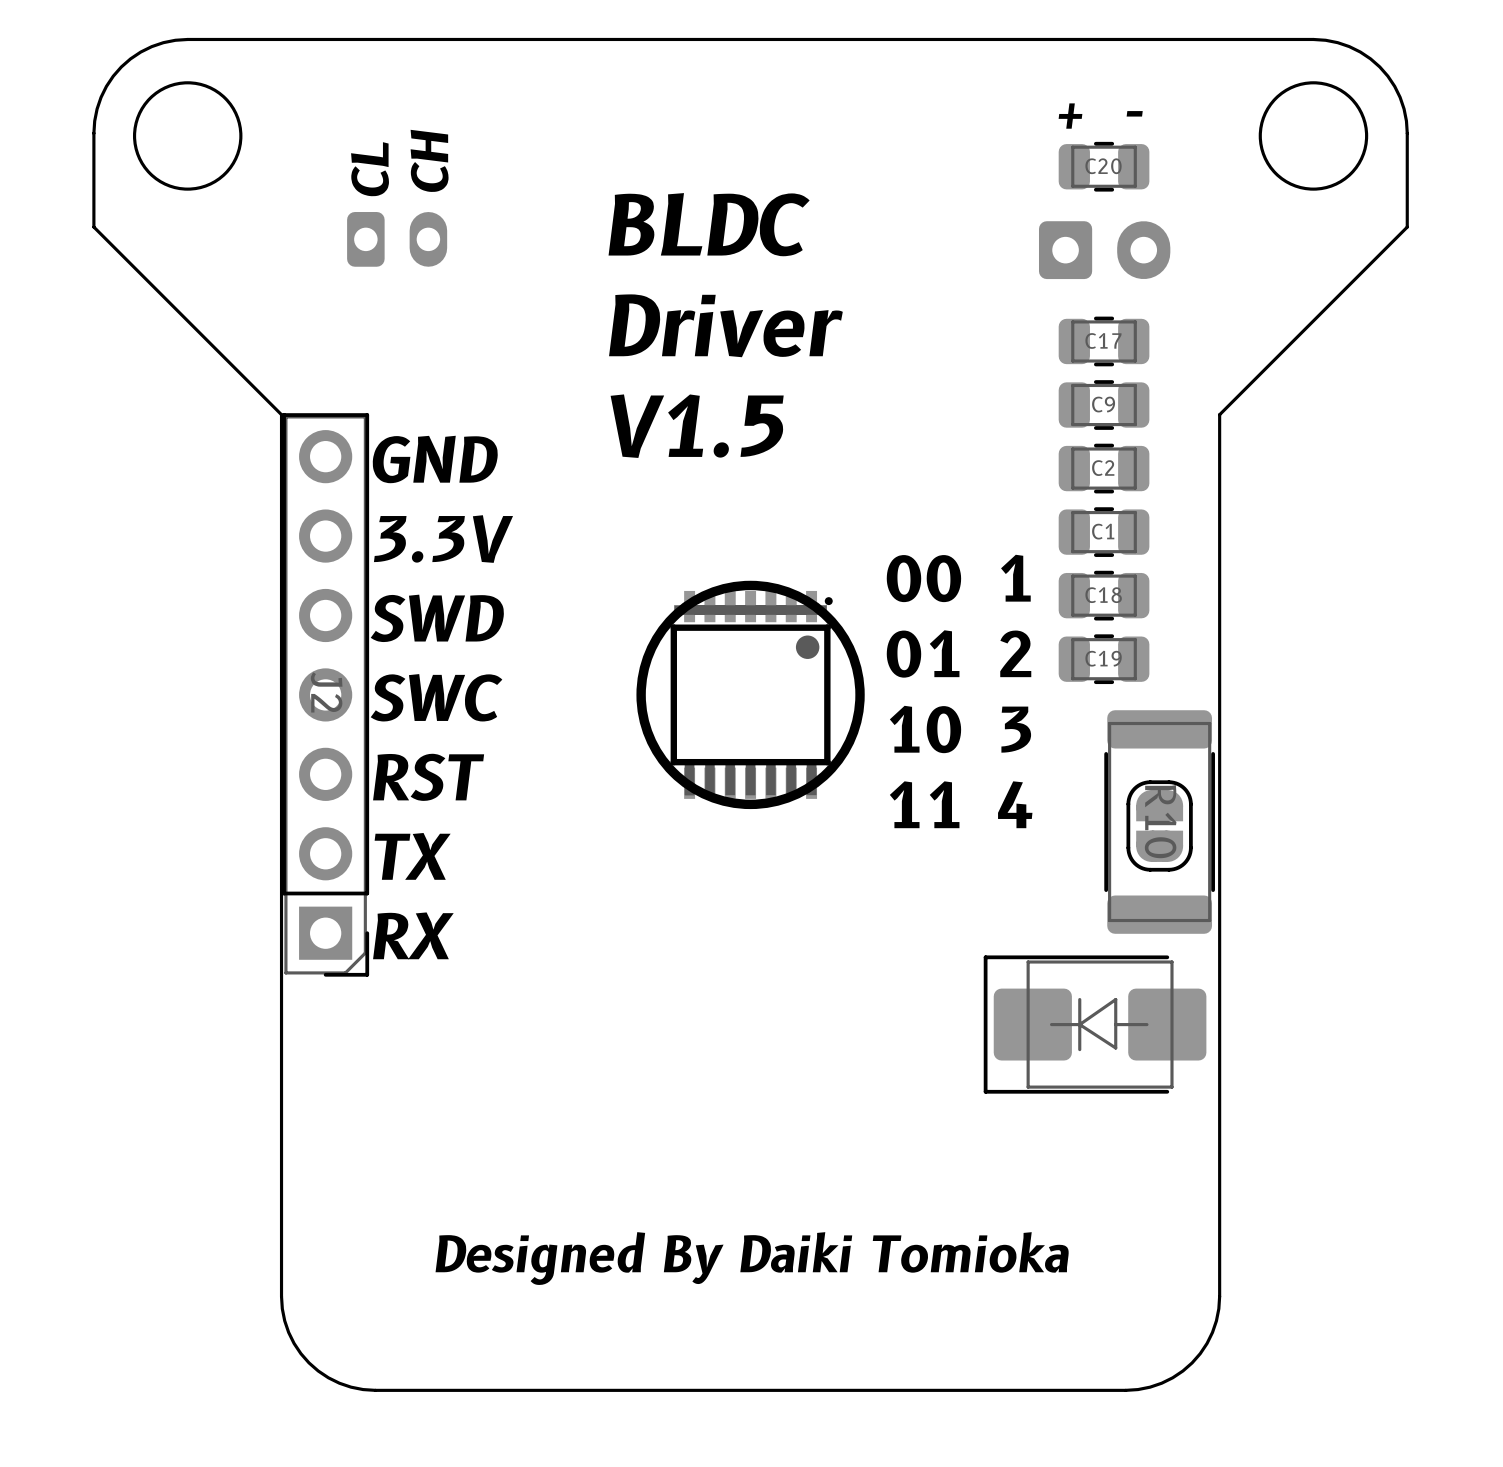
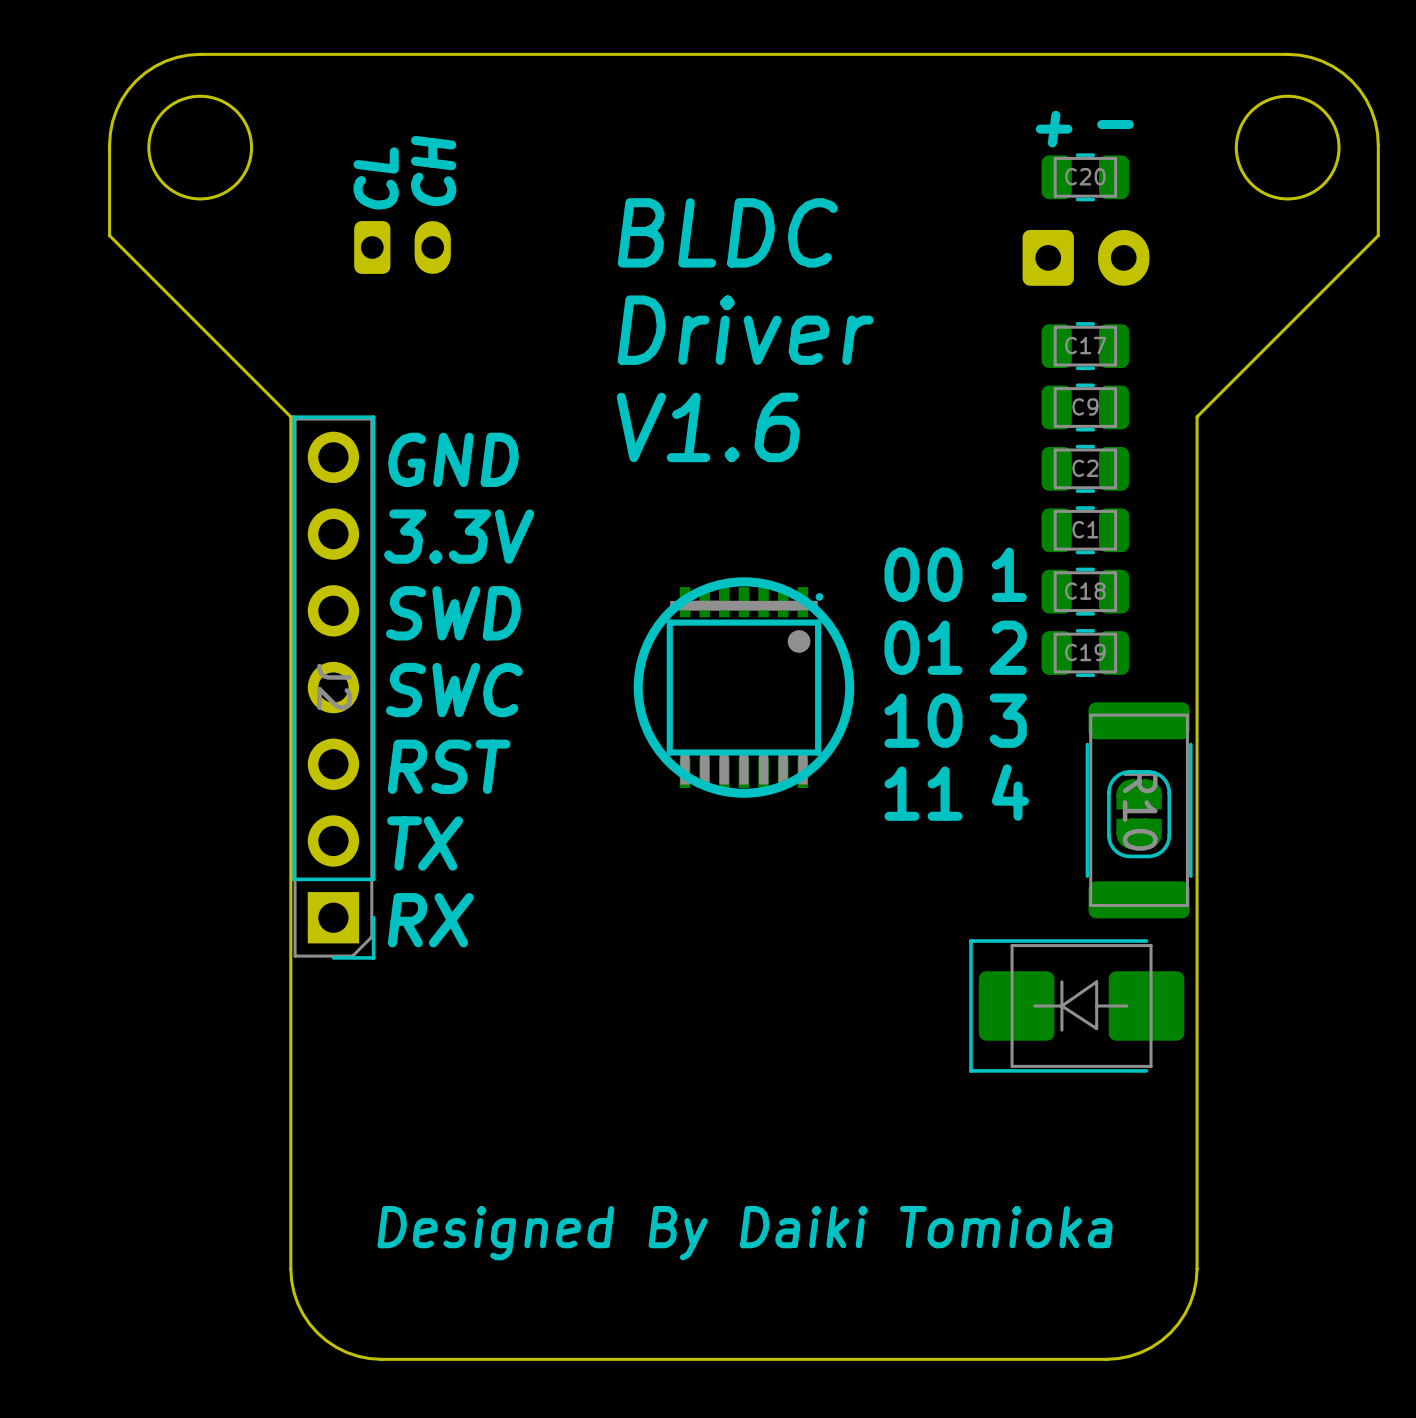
text: V1.5 (697, 426) -> V1.6 (708, 427)

